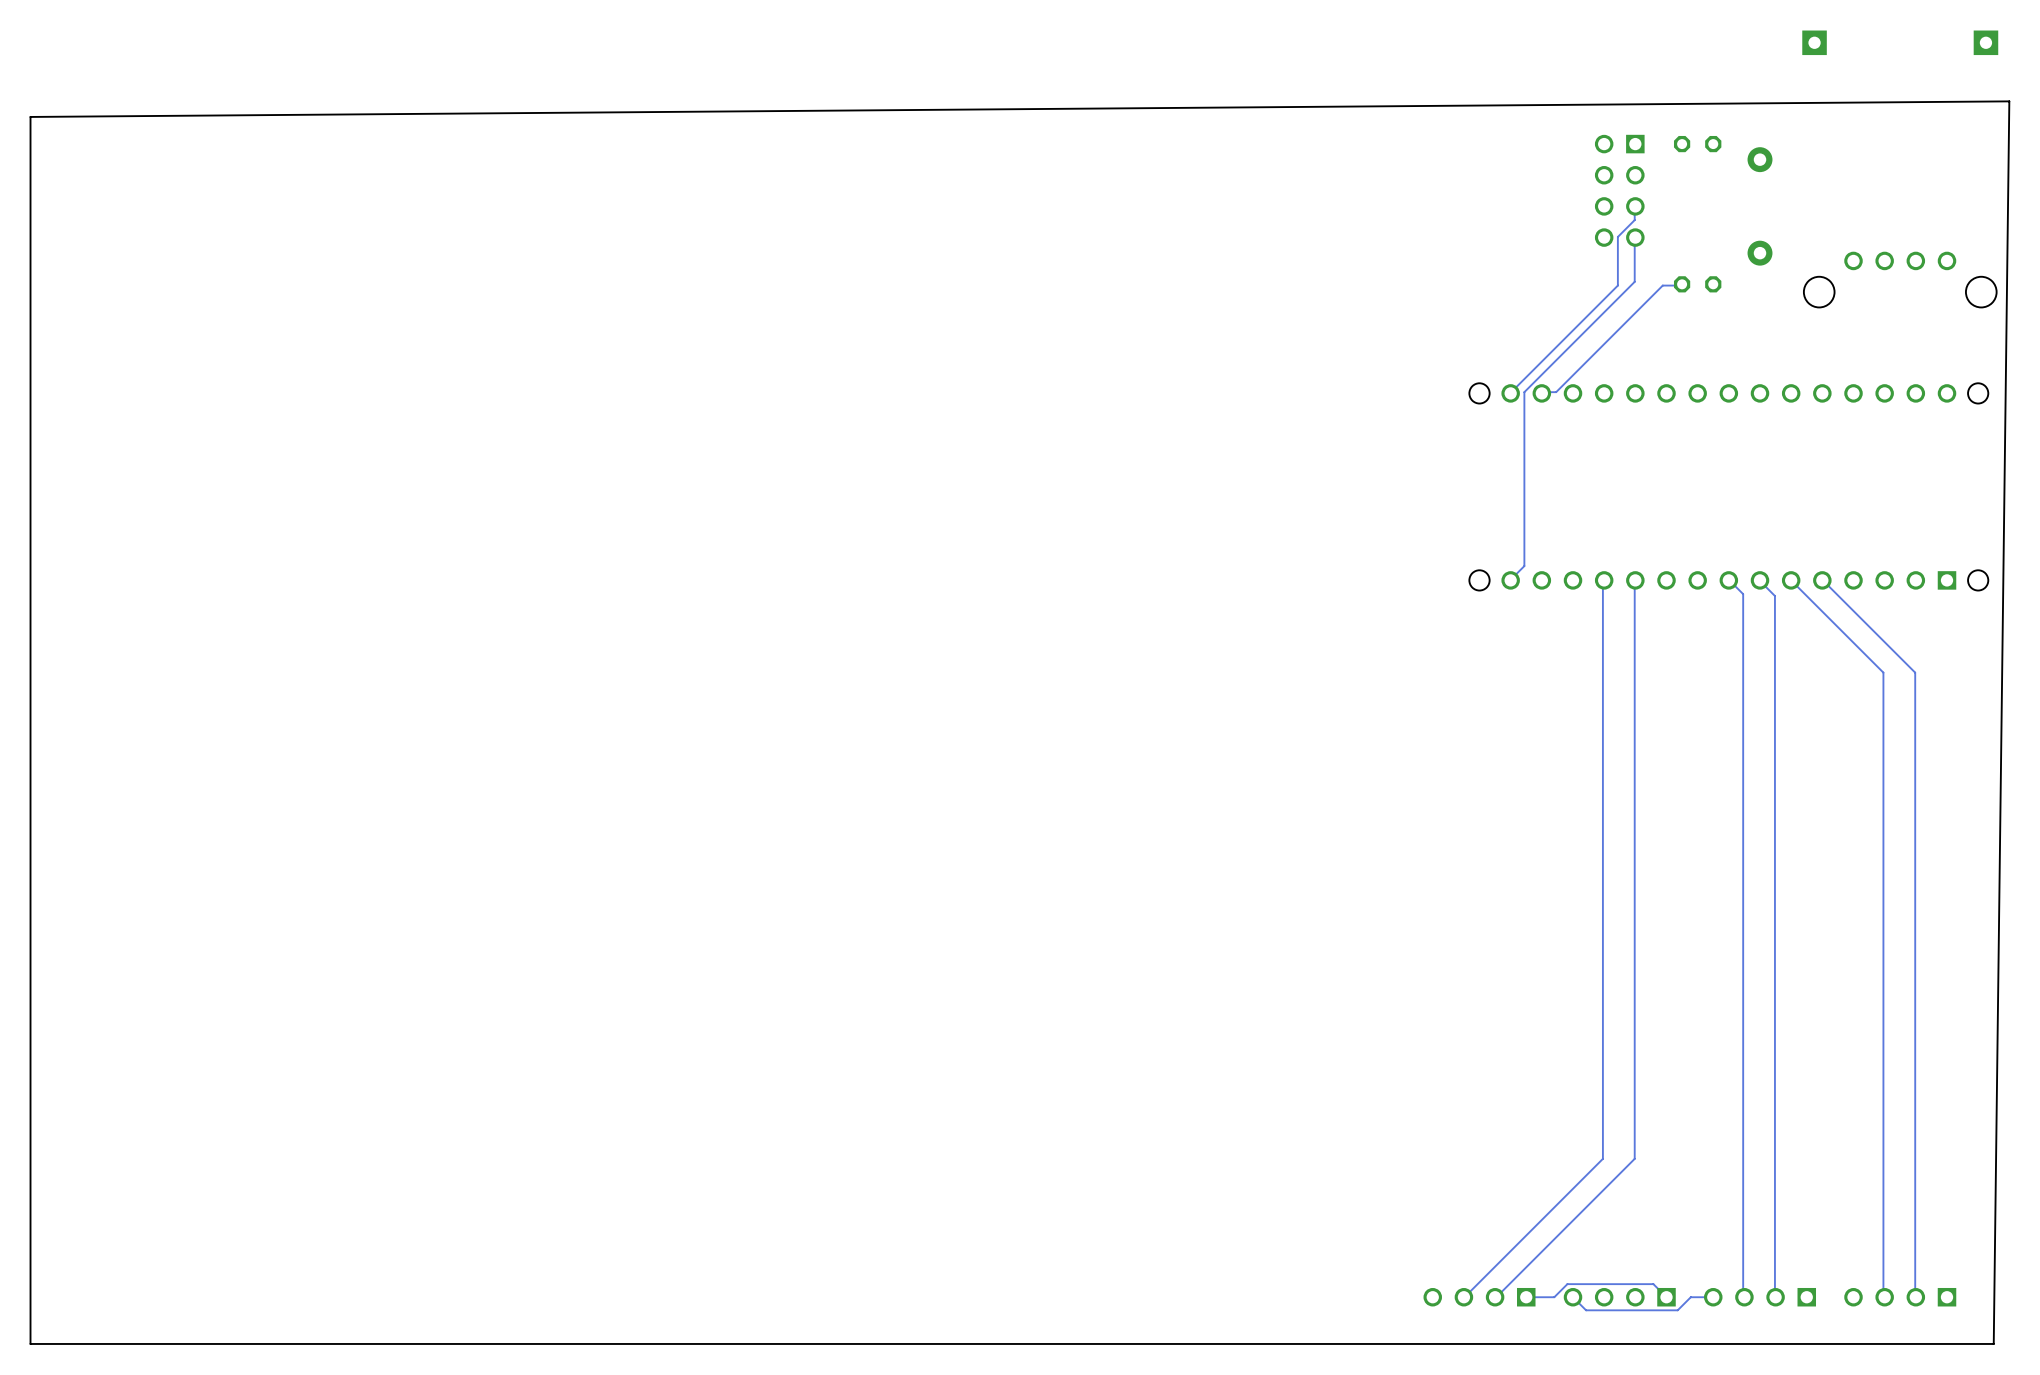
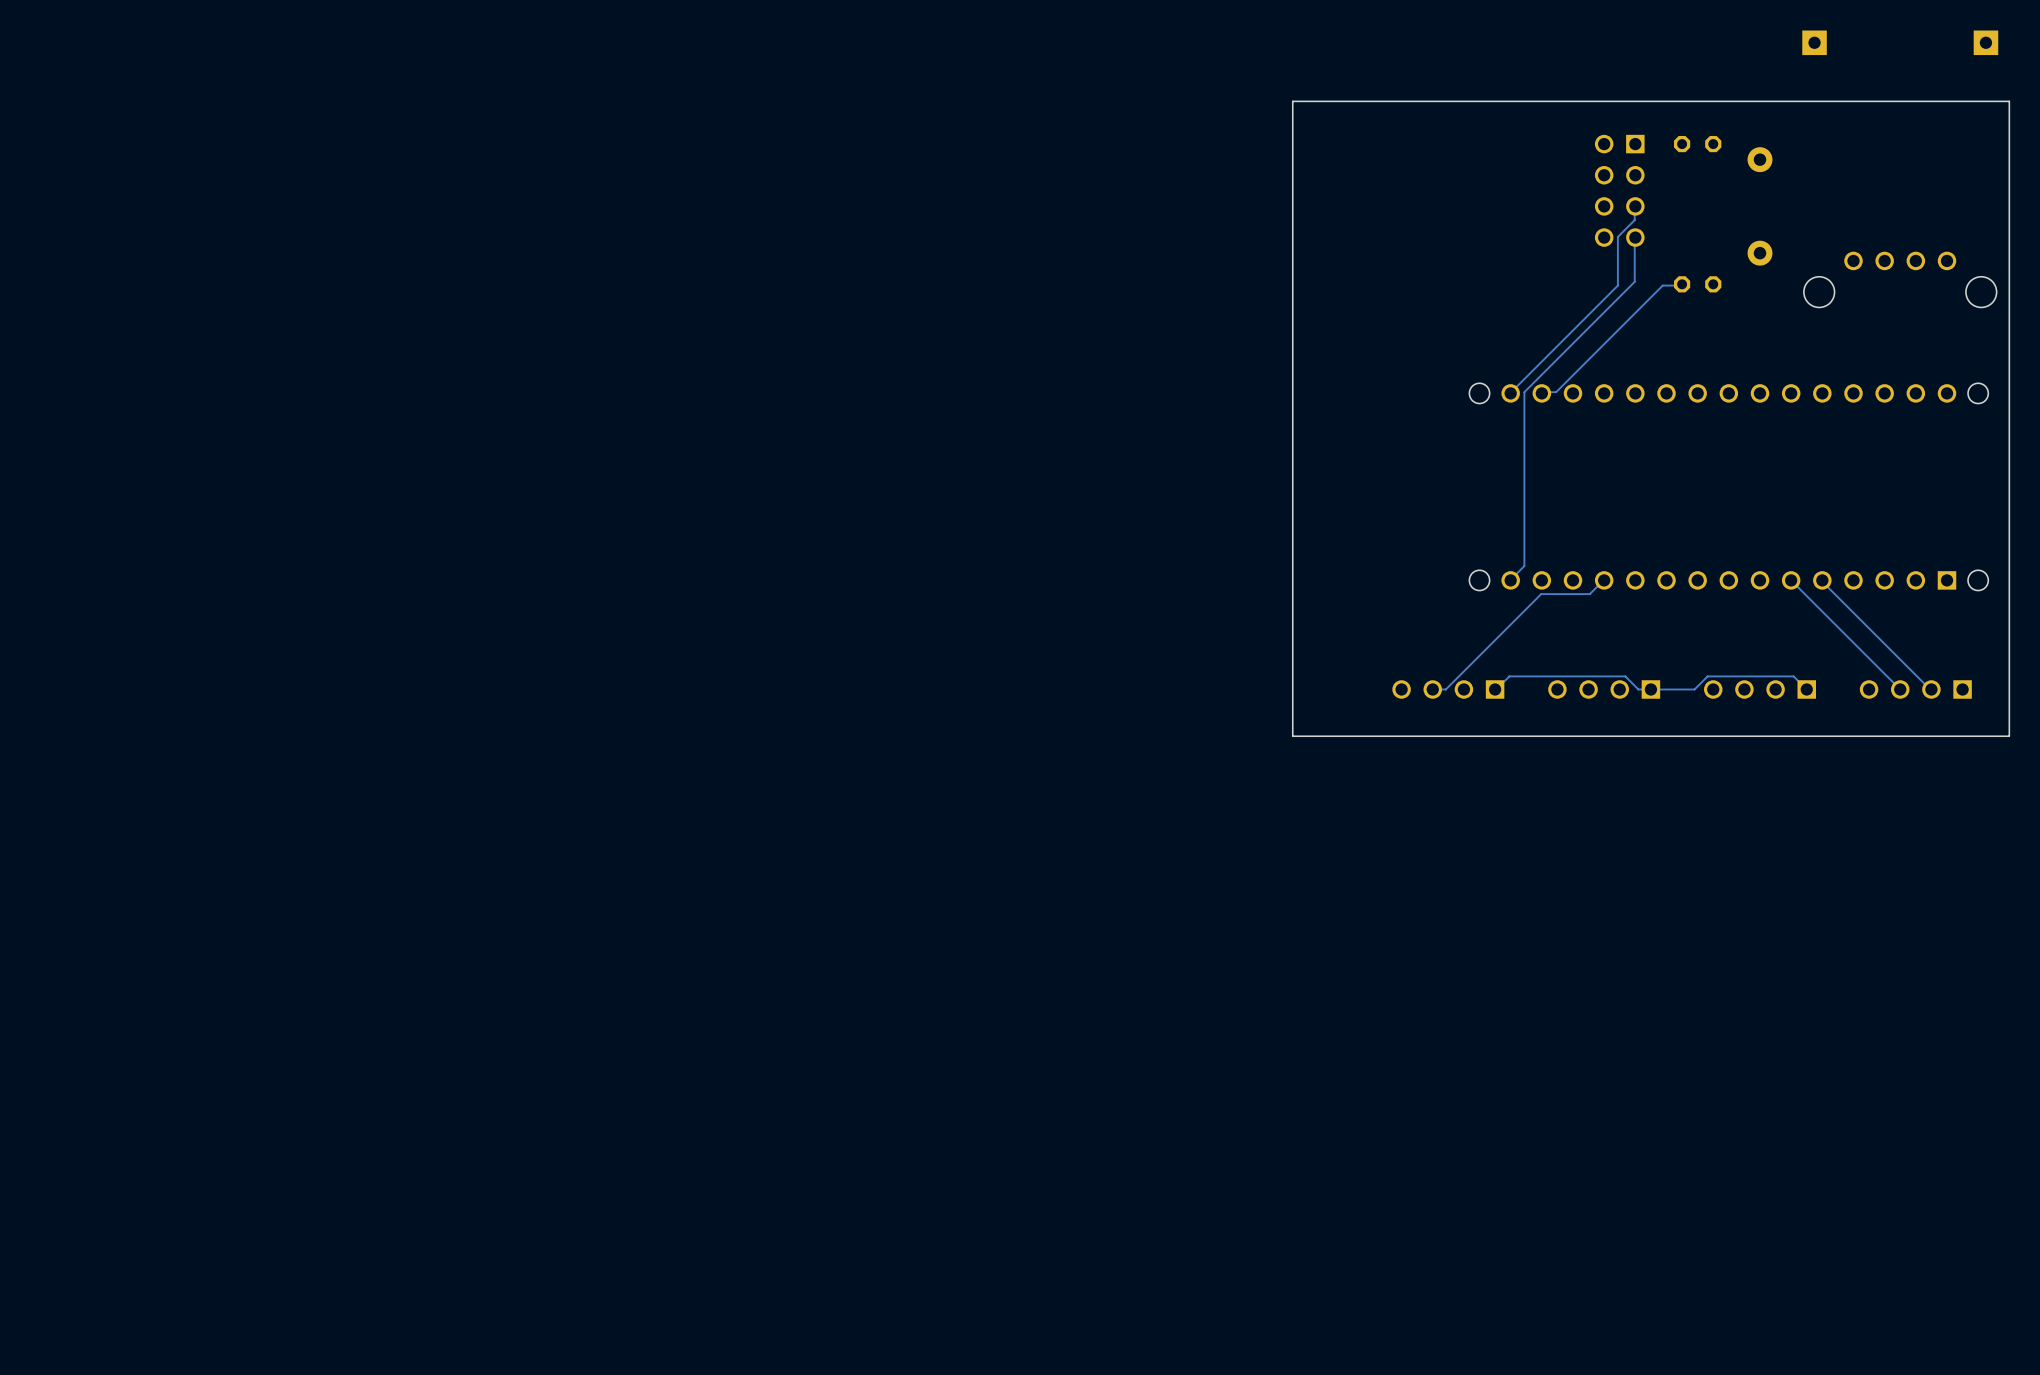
board edge: (2009, 101) (30, 116) (30, 1343) (1993, 1343) (2009, 101) -> (2009, 101) (2009, 736) (1292, 736) (1292, 101) (2009, 101)
track: (1635, 580) (1634, 1158) (1495, 1297) -> none
track: (1728, 580) (1743, 594) (1744, 1297) -> none
track: (1760, 580) (1774, 595) (1775, 1297) -> none
track: (1822, 580) (1915, 672) (1915, 1297) -> (1822, 580) (1931, 689)
track: (1602, 581) (1602, 1158) (1463, 1297) -> (1602, 581) (1589, 594) (1541, 594) (1445, 689) (1432, 689)
track: (1883, 672) (1884, 1297) -> (1883, 672) (1900, 689)
part: none -> (1448, 689)
part: none -> (1604, 689)
part: none -> (1760, 689)
track: none -> (1806, 689) (1793, 676) (1707, 676) (1694, 689) (1638, 689) (1625, 676) (1509, 676) (1495, 689)
part: none -> (1915, 689)
part: (1479, 1297) -> none
part: (1619, 1297) -> none
track: (1666, 1297) (1653, 1284) (1567, 1284) (1554, 1297) (1526, 1297) -> none
track: (1713, 1297) (1690, 1297) (1677, 1310) (1586, 1310) (1573, 1297) -> none
part: (1760, 1297) -> none
part: (1900, 1297) -> none

